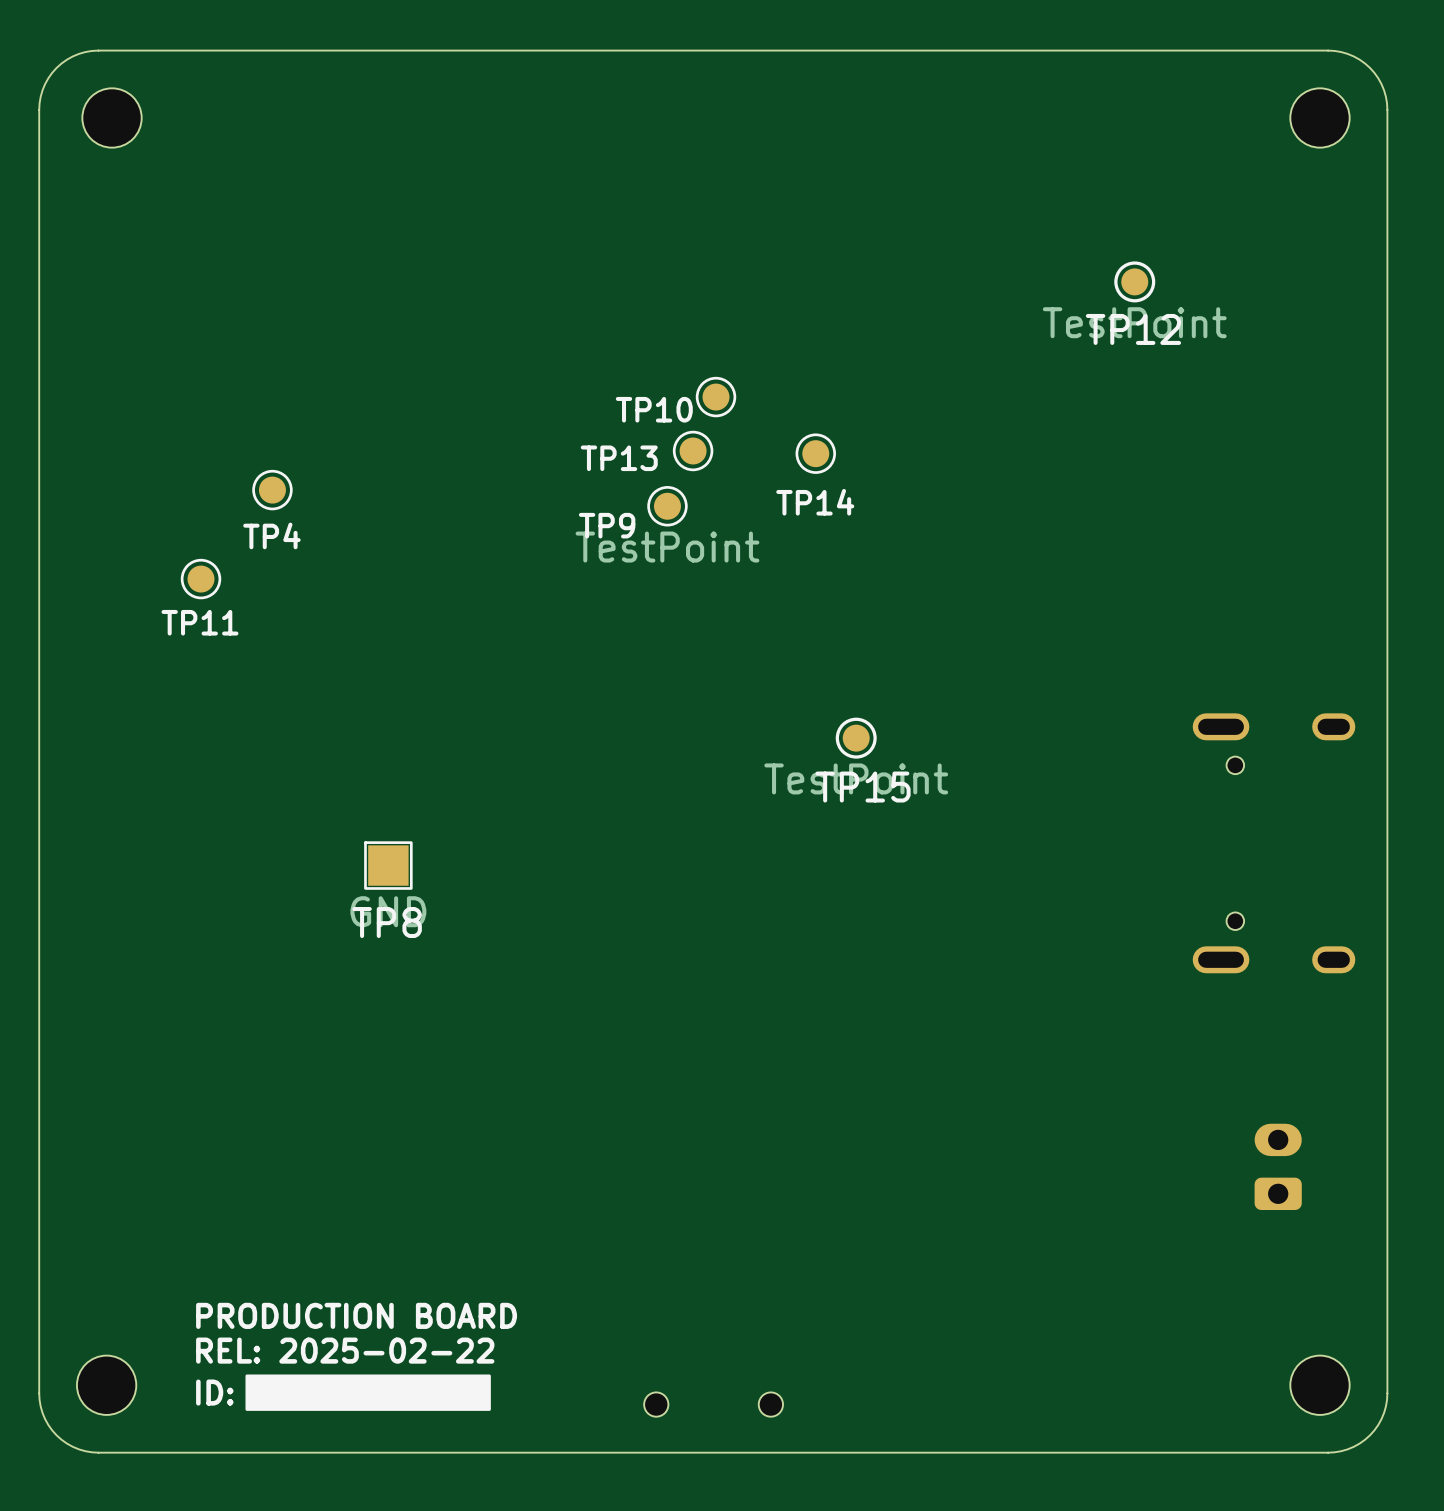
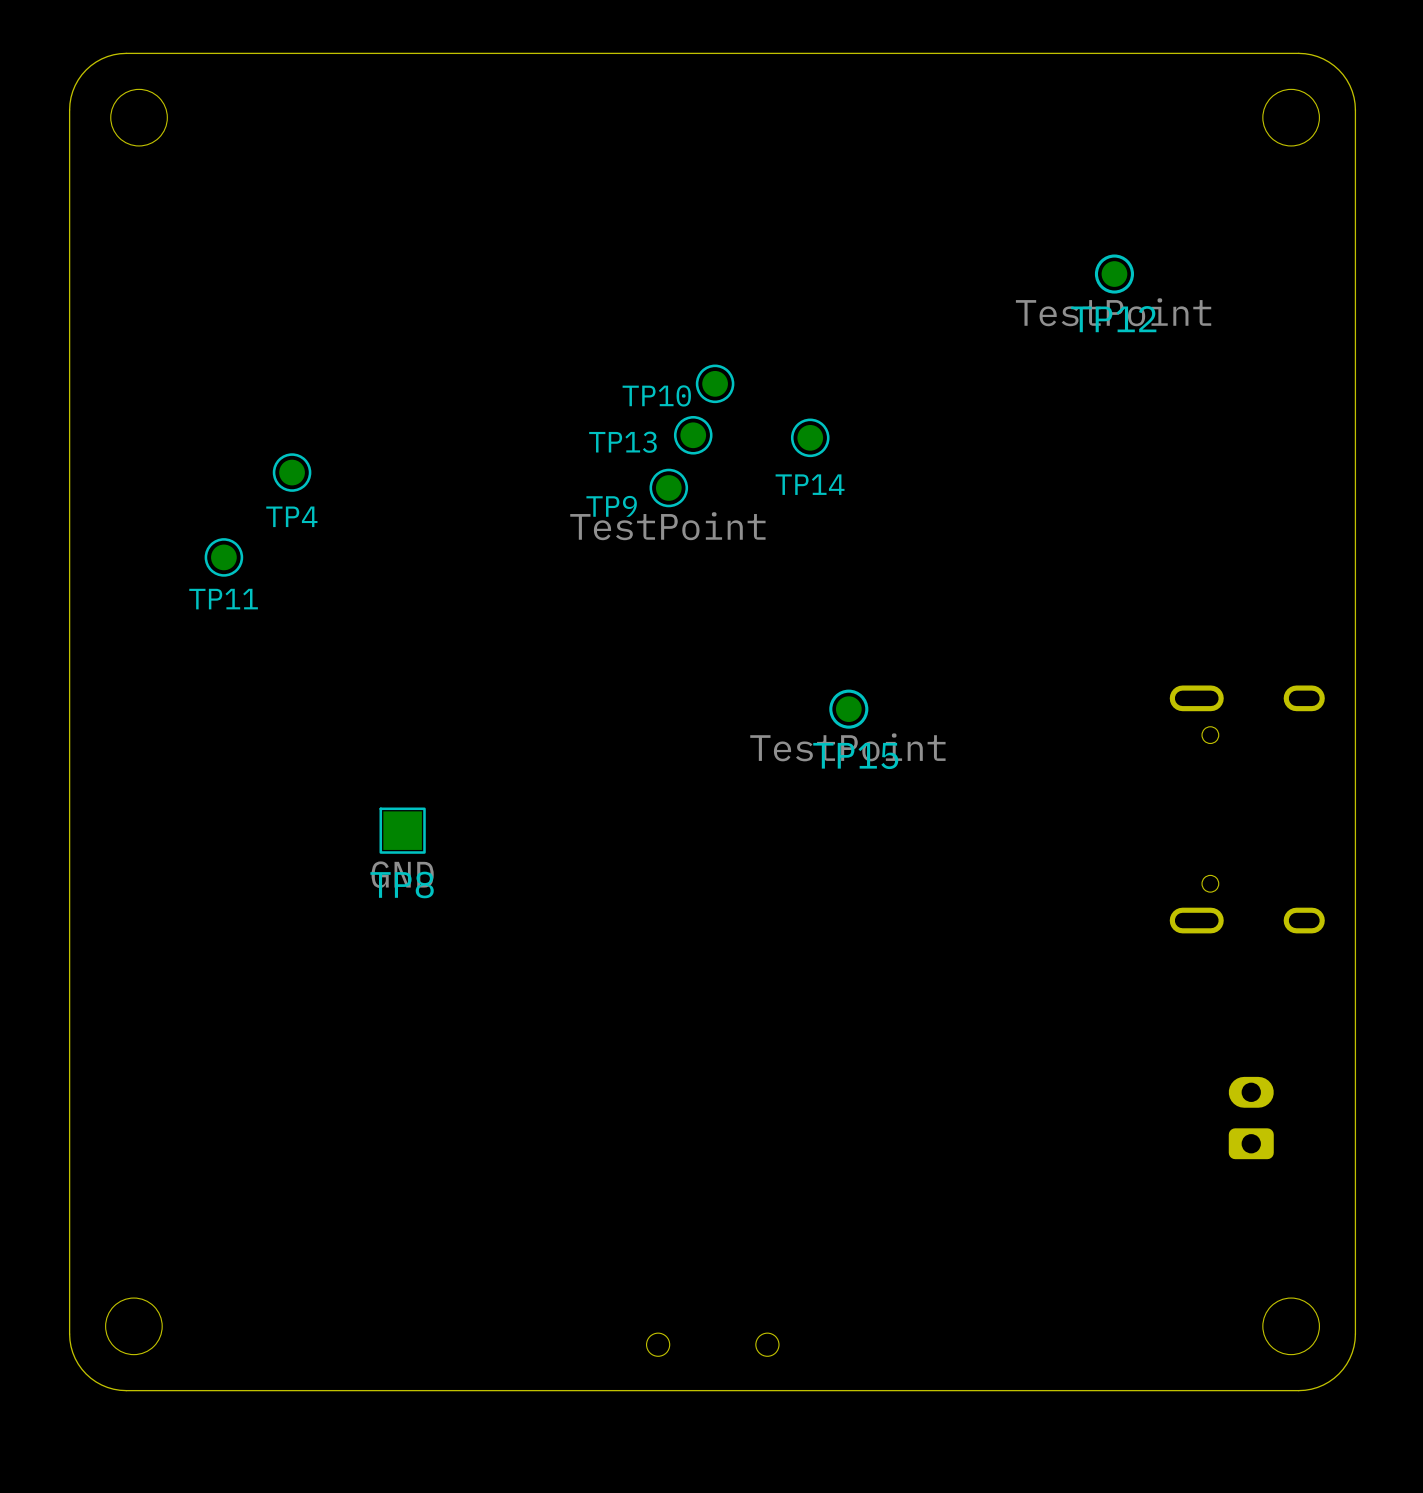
text: PRODUCTION BOARD (356, 1315) -> none
text: REL: 2025-02-22 (345, 1350) -> none
drawing: [245, 1374, 491, 1411] -> none
text: ID: (214, 1392) -> none

